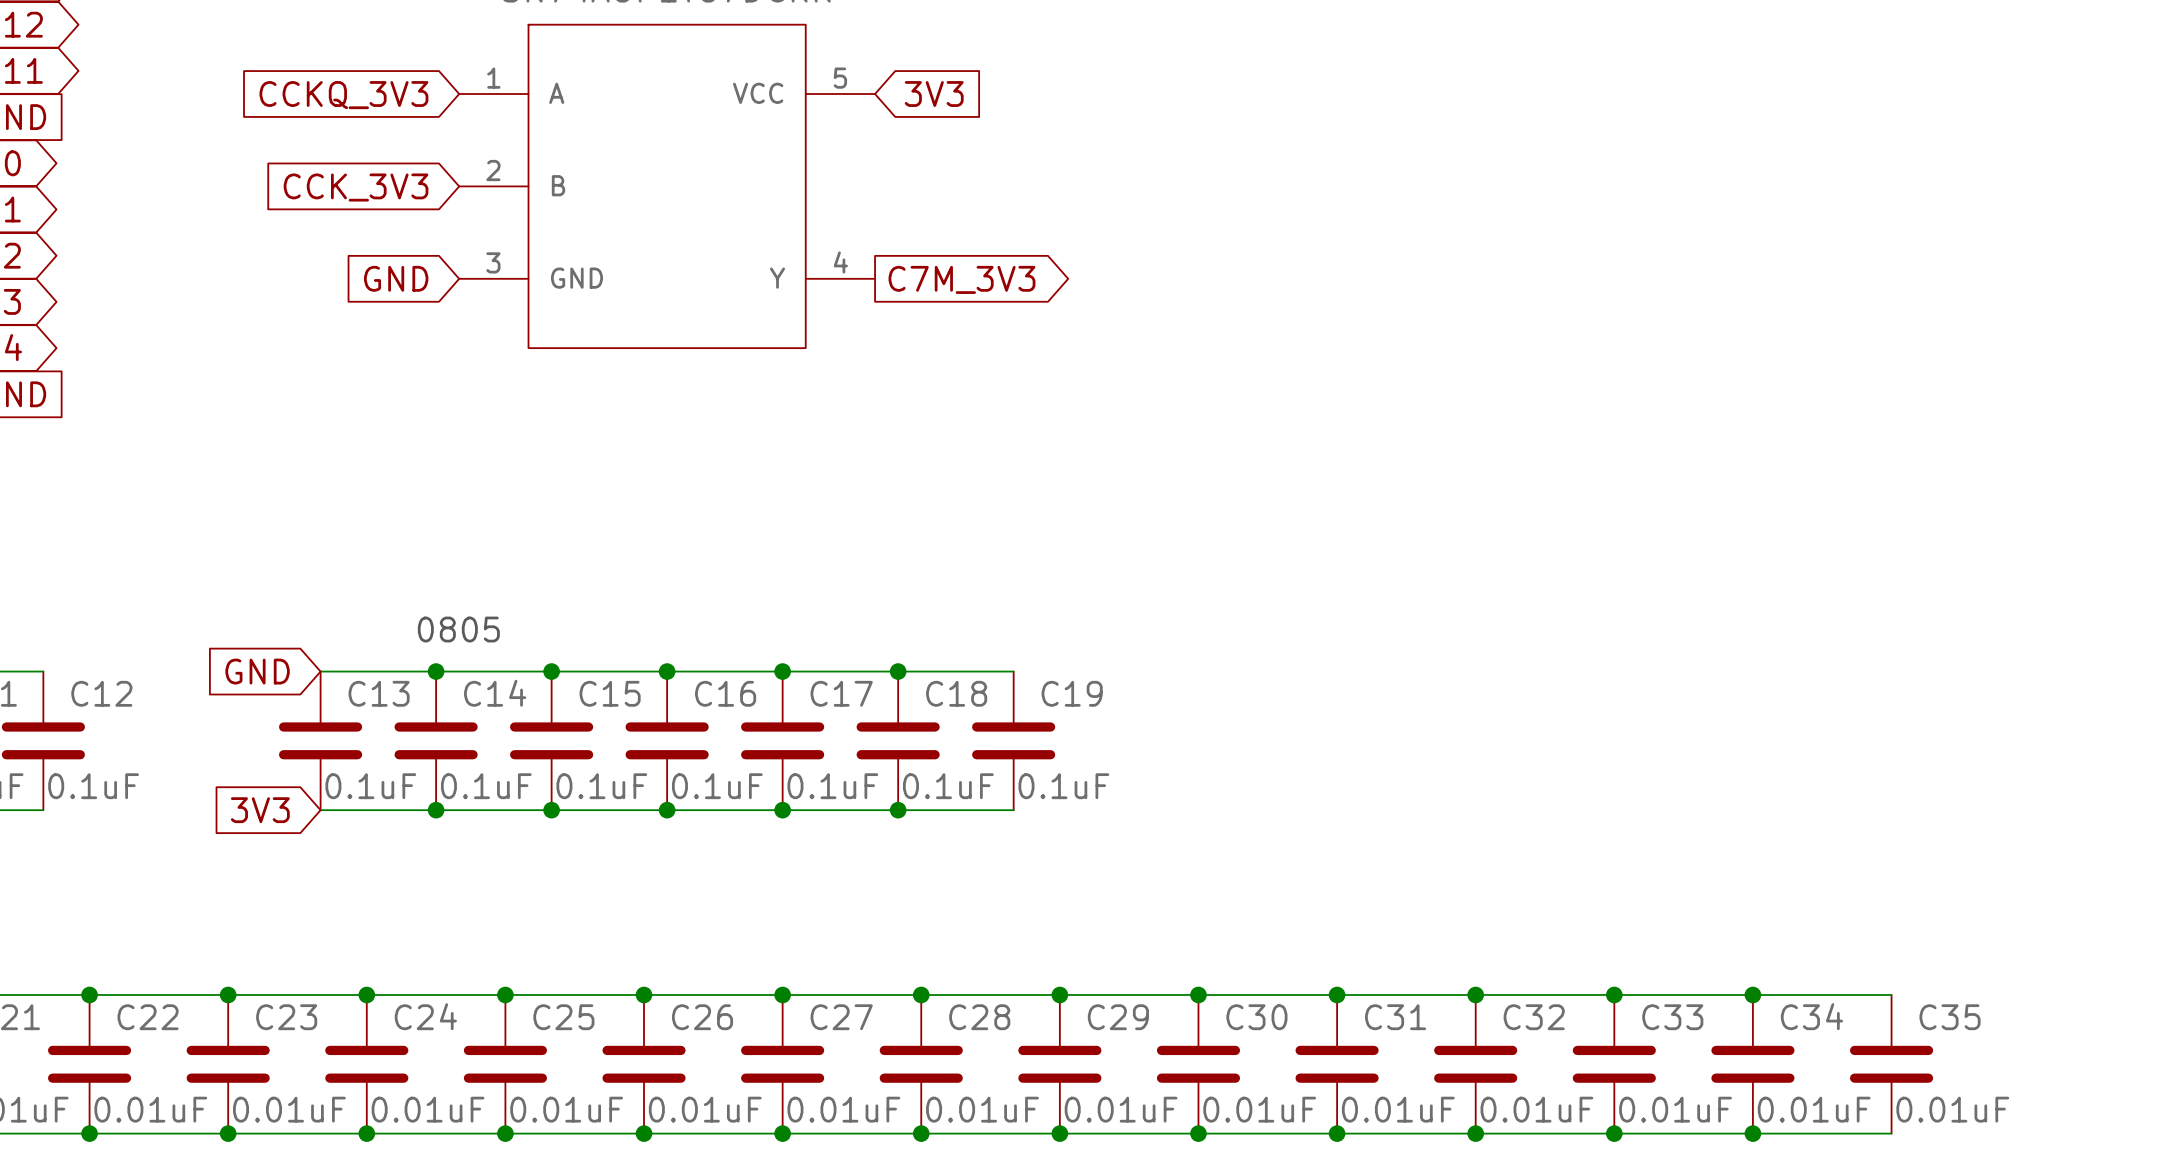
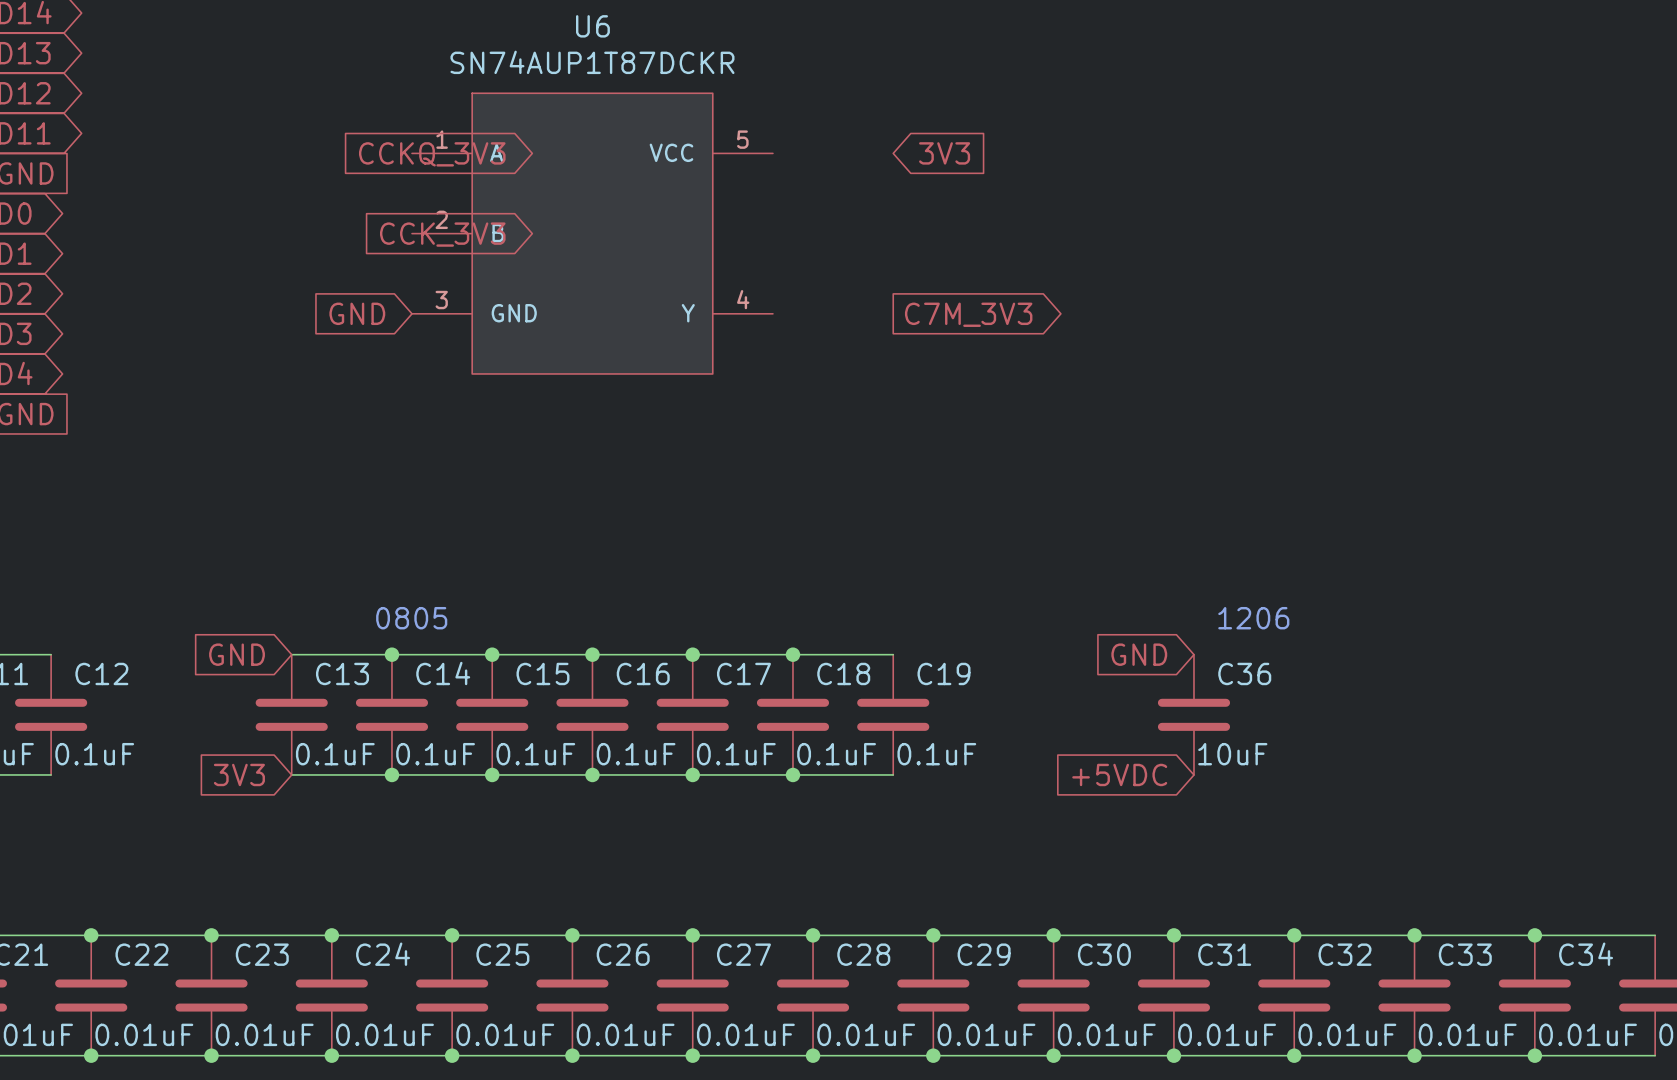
global label position: 3V3 (934, 94) -> 3V3 (944, 153)
global label position: CCKQ_3V3 (343, 95) -> CCKQ_3V3 (432, 154)
global label position: CCK_3V3 (356, 187) -> CCK_3V3 (442, 234)
global label position: C7M_3V3 (961, 279) -> C7M_3V3 (968, 314)
text: none -> 1206 (1253, 618)
global label: none -> GND (1139, 654)
C36: none -> 10uF (1193, 714)
global label: none -> +5VDC (1119, 774)

